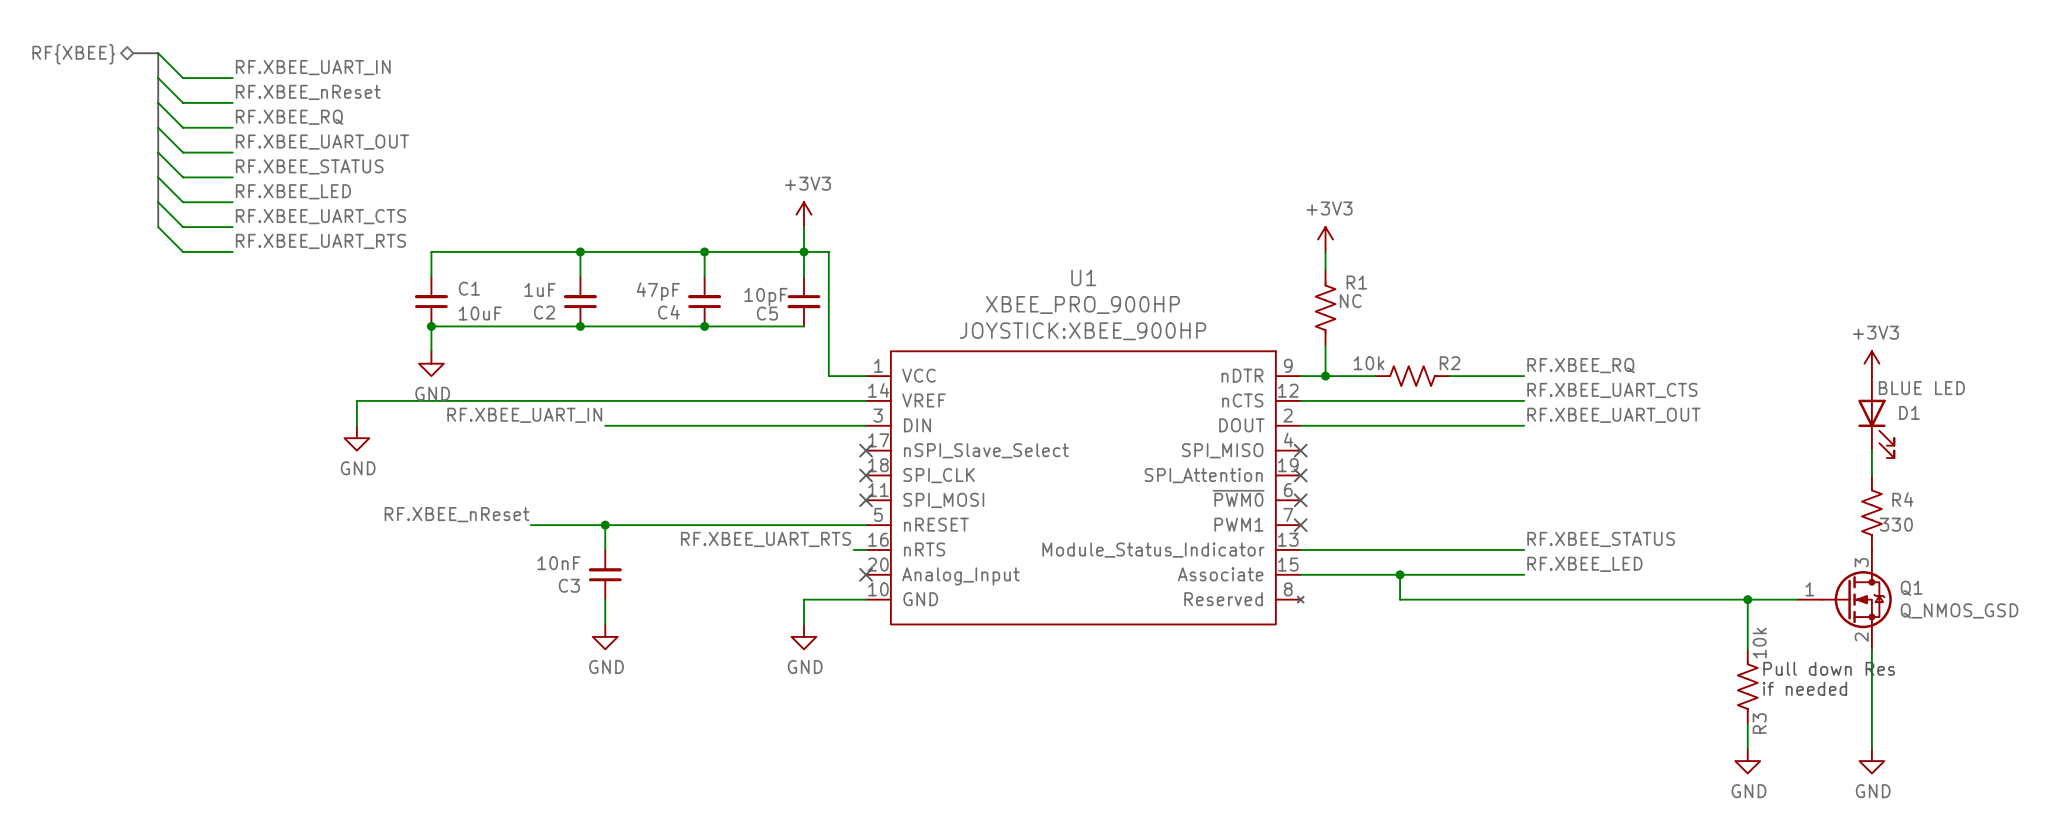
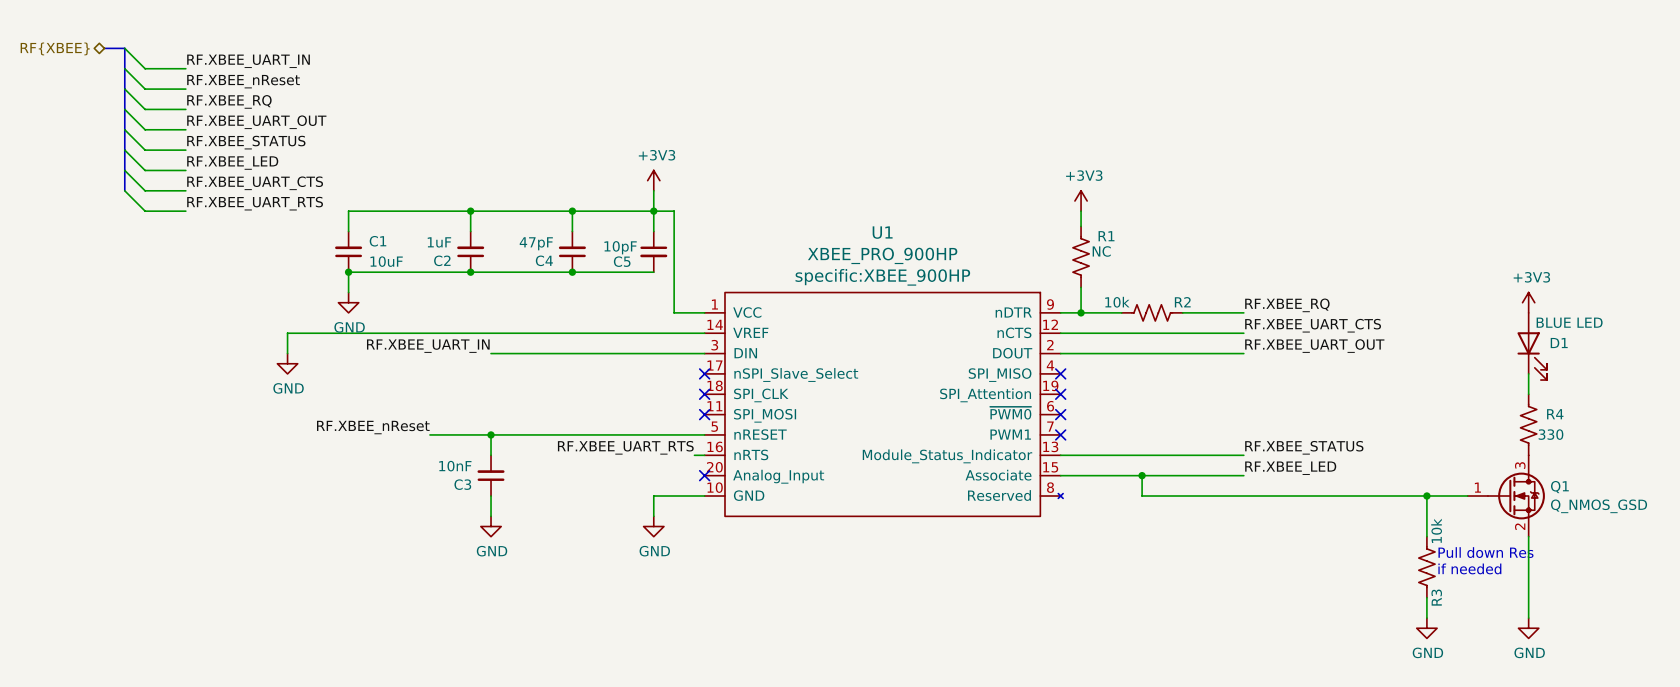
U1 text: JOYSTICK:XBEE_900HP (1083, 331) -> specific:XBEE_900HP (882, 277)

